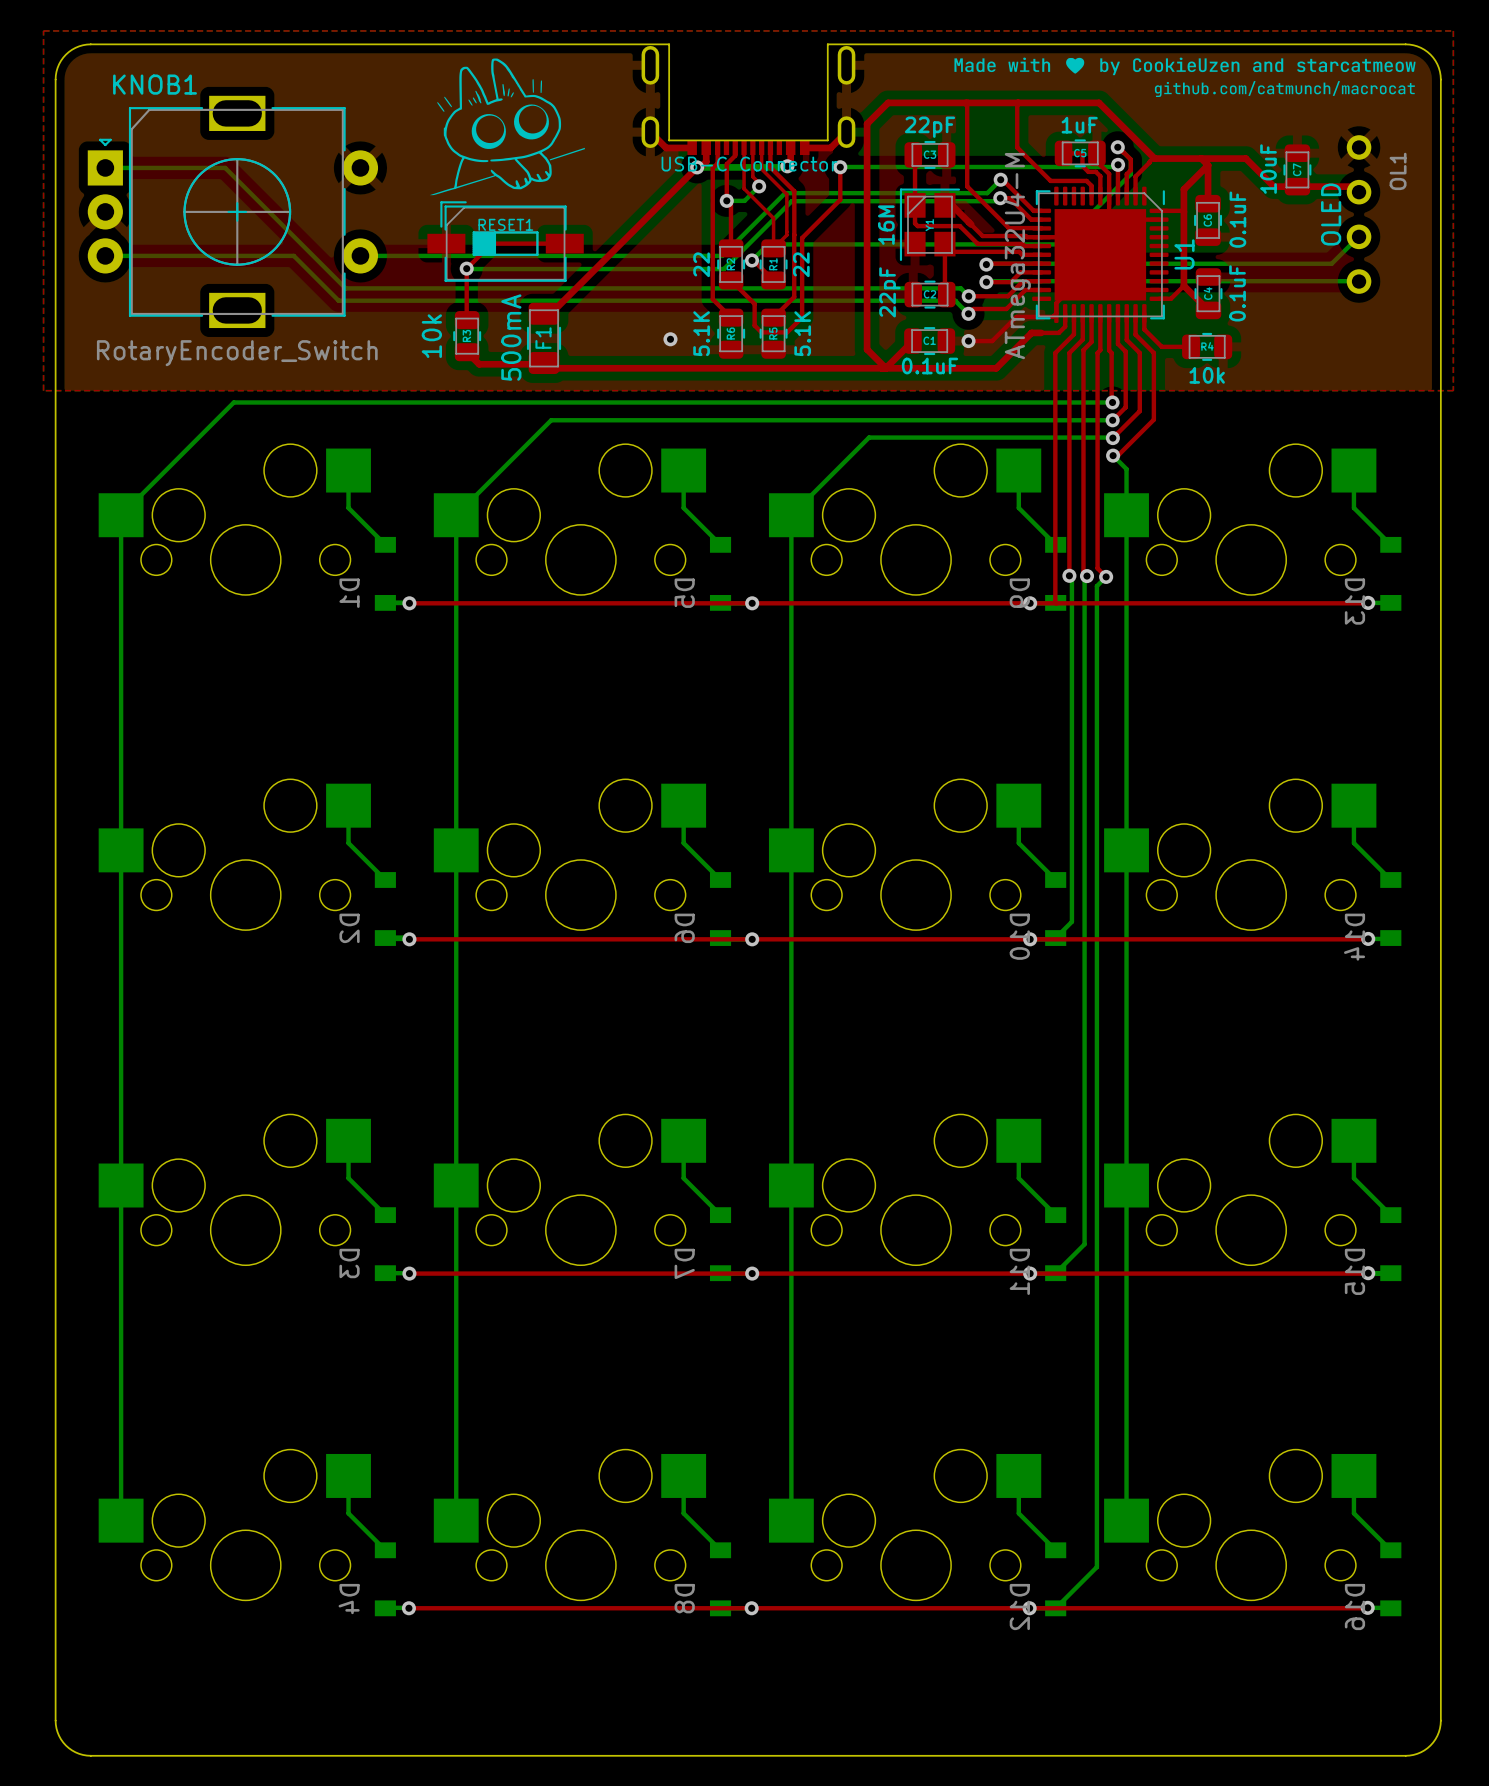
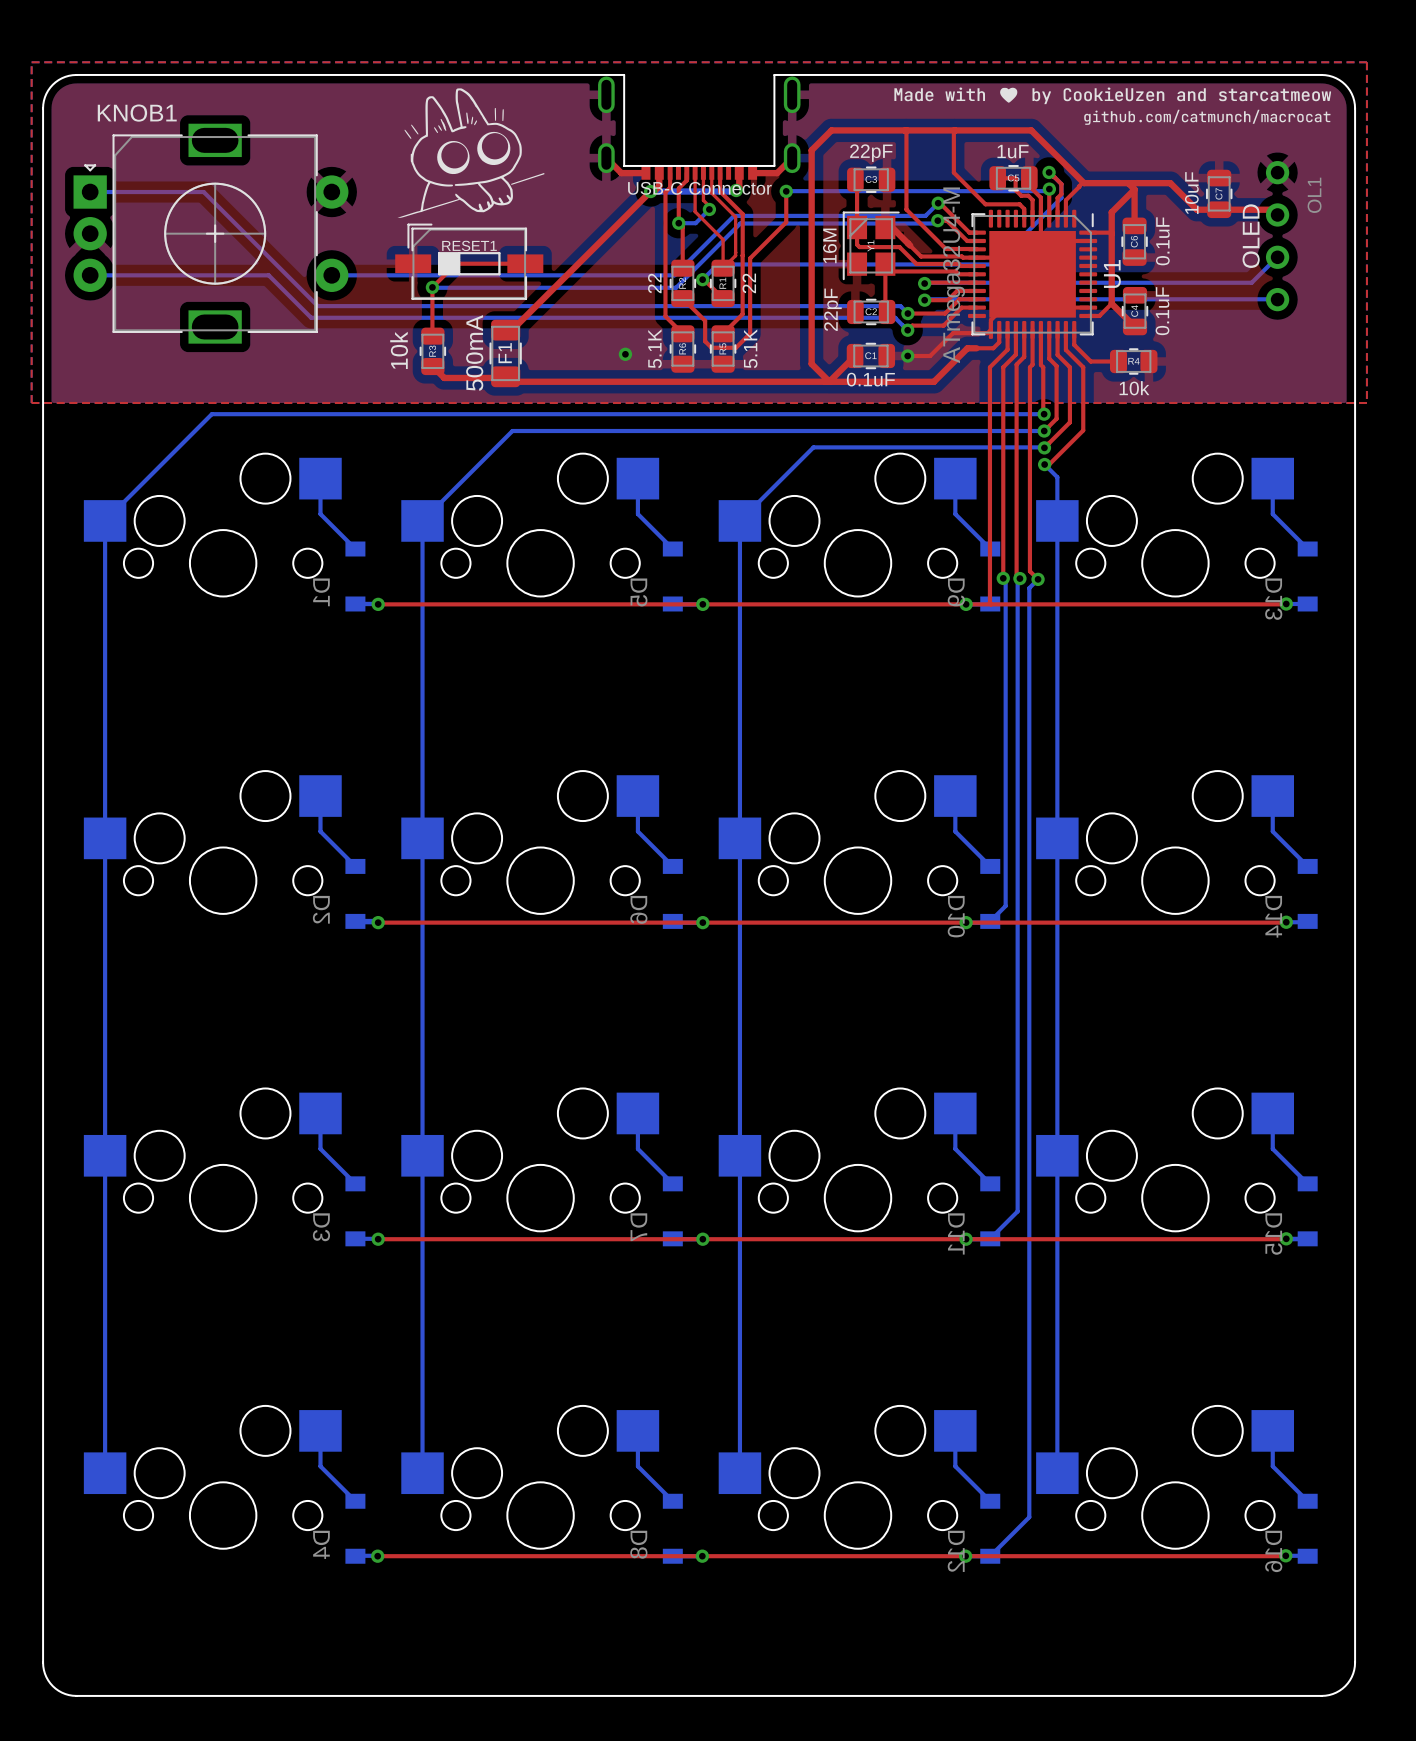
KNOB1 value: RotaryEncoder_Switch (237, 353) -> none

